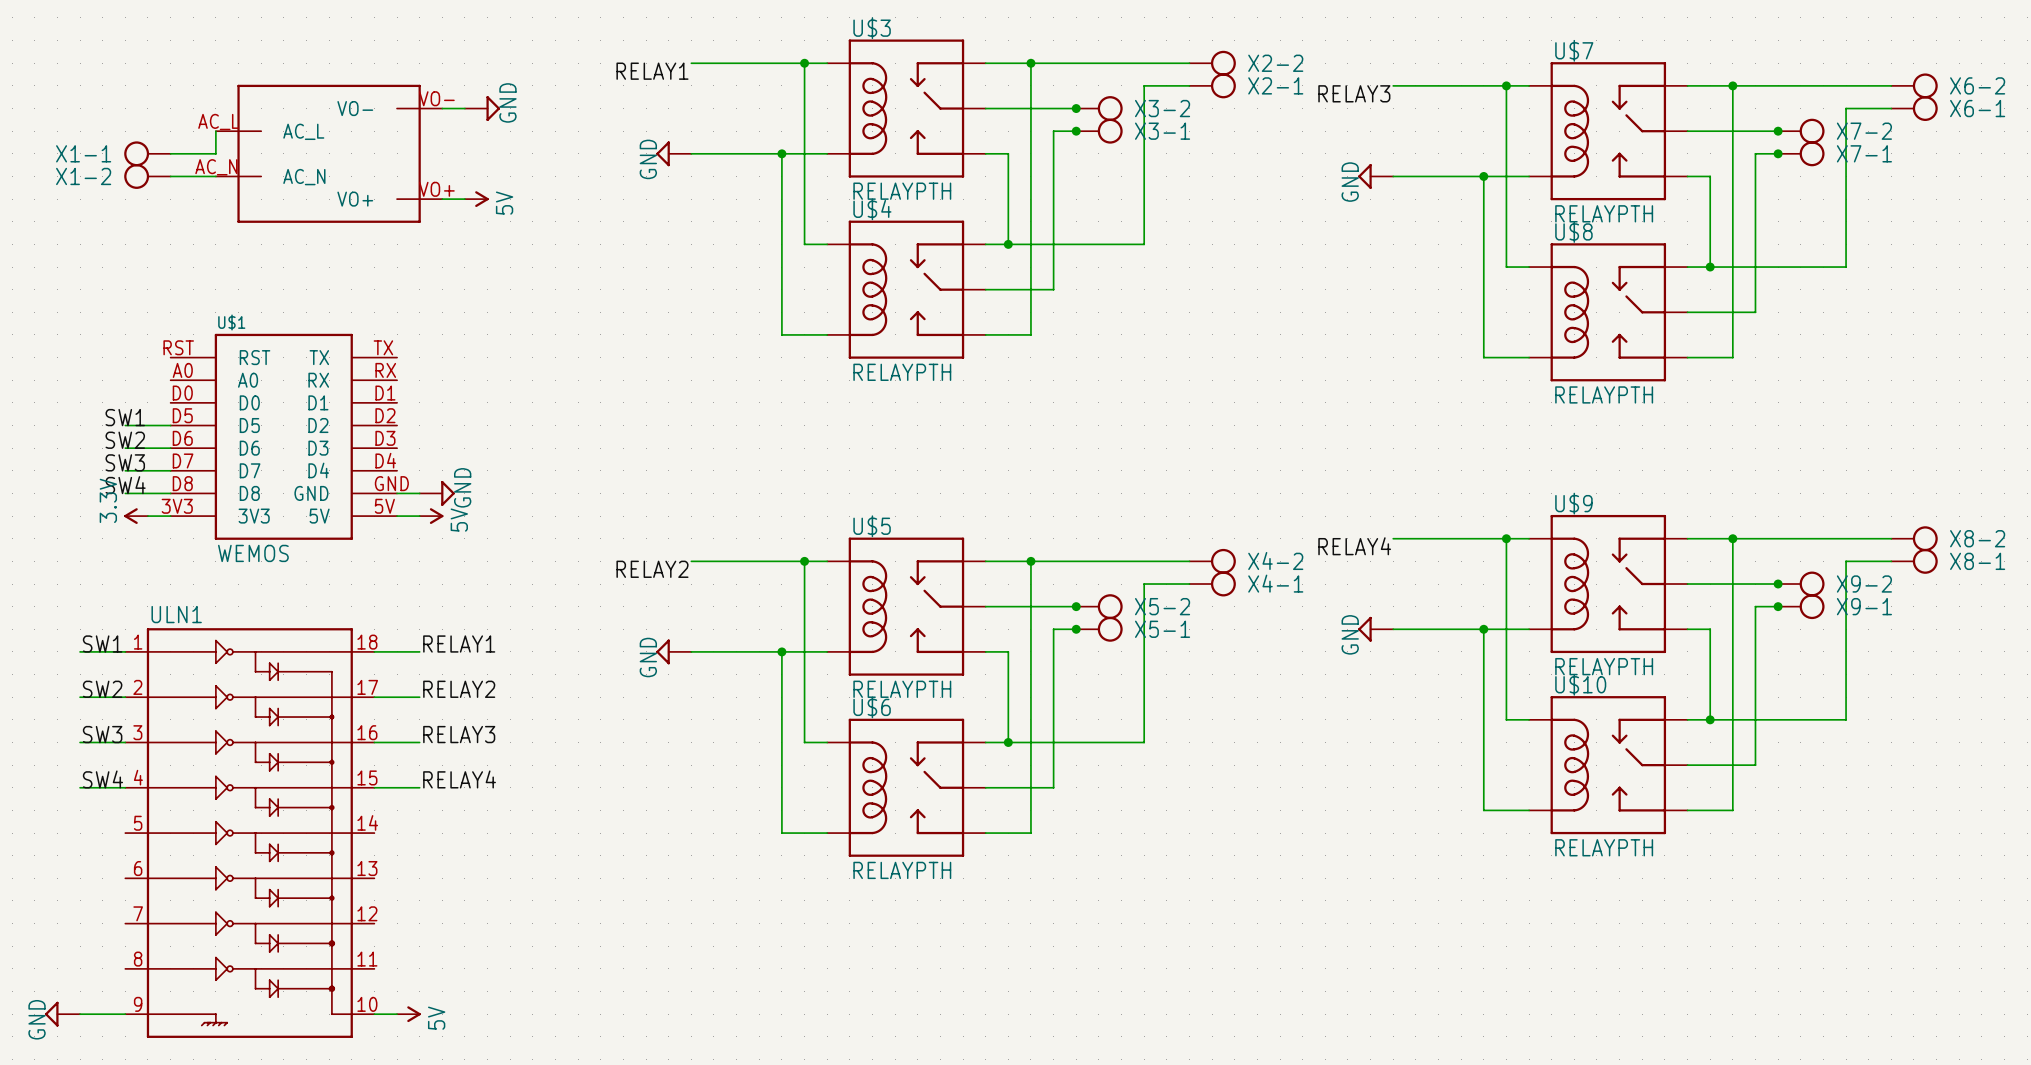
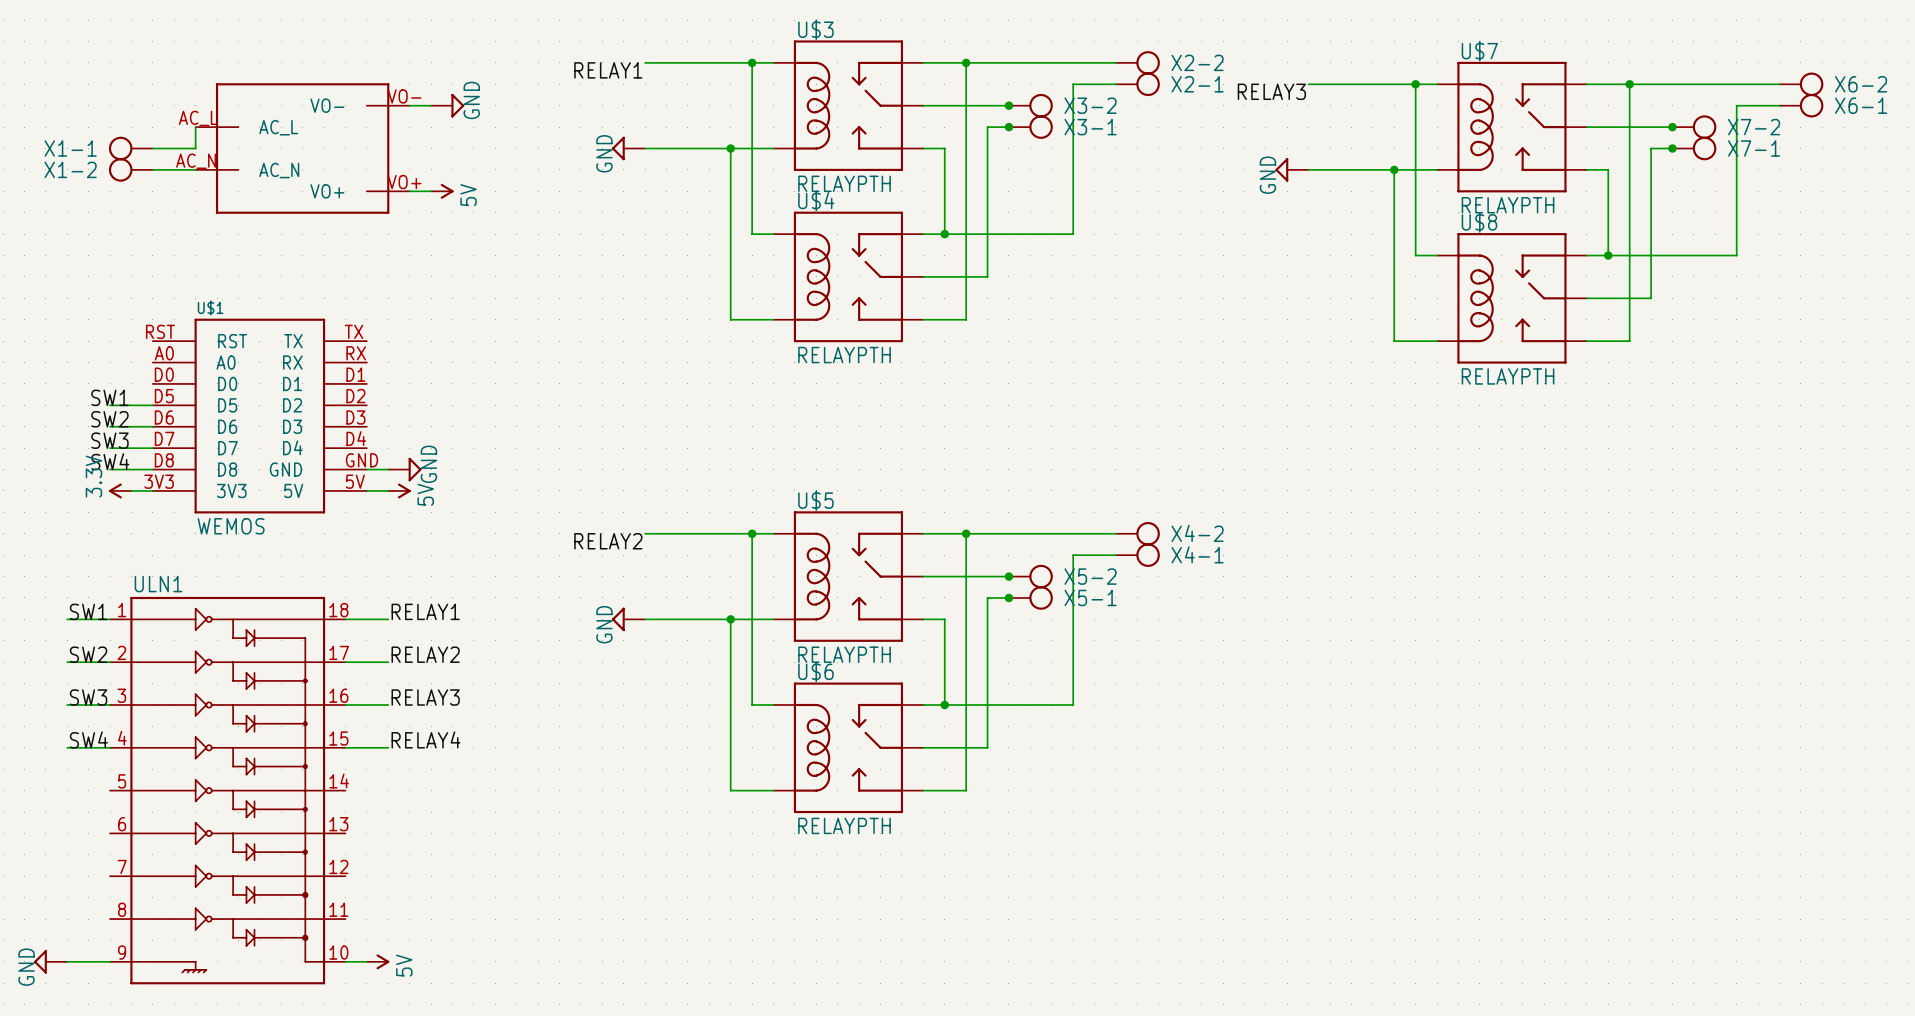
wire: (1393, 538) (1529, 538) -> none
wire: (1506, 538) (1506, 719) (1529, 719) -> none
junction: (1506, 538) -> none
wire: (1687, 538) (1891, 538) -> none
wire: (1732, 538) (1732, 810) (1687, 810) -> none
junction: (1732, 538) -> none
X8-2: (1914, 538) -> none
label: RELAY4 (1354, 546) -> none
wire: (1891, 561) (1846, 561) (1846, 719) (1687, 719) -> none
X8-1: (1914, 561) -> none
U$9: RELAYPTH (1608, 584) -> none
wire: (1687, 584) (1778, 584) -> none
junction: (1778, 584) -> none
X9-2: (1801, 584) -> none
wire: (1778, 606) (1755, 606) (1755, 765) (1687, 765) -> none
junction: (1778, 606) -> none
X9-1: (1801, 606) -> none
power symbol: GND (1375, 629) -> none
wire: (1393, 629) (1529, 629) -> none
wire: (1483, 629) (1483, 810) (1529, 810) -> none
junction: (1483, 629) -> none
wire: (1687, 629) (1710, 629) (1710, 719) -> none
junction: (1710, 719) -> none
U$10: RELAYPTH (1608, 765) -> none

